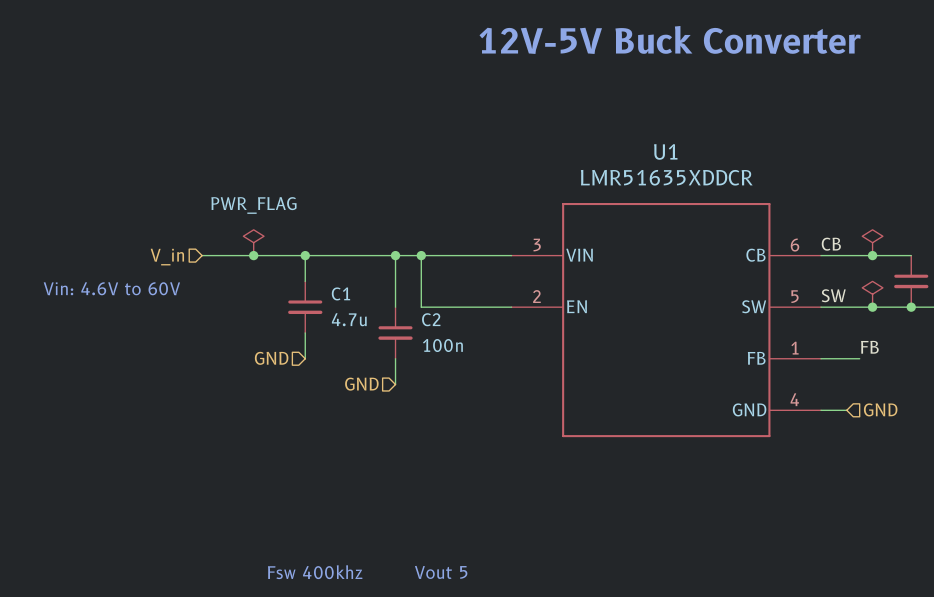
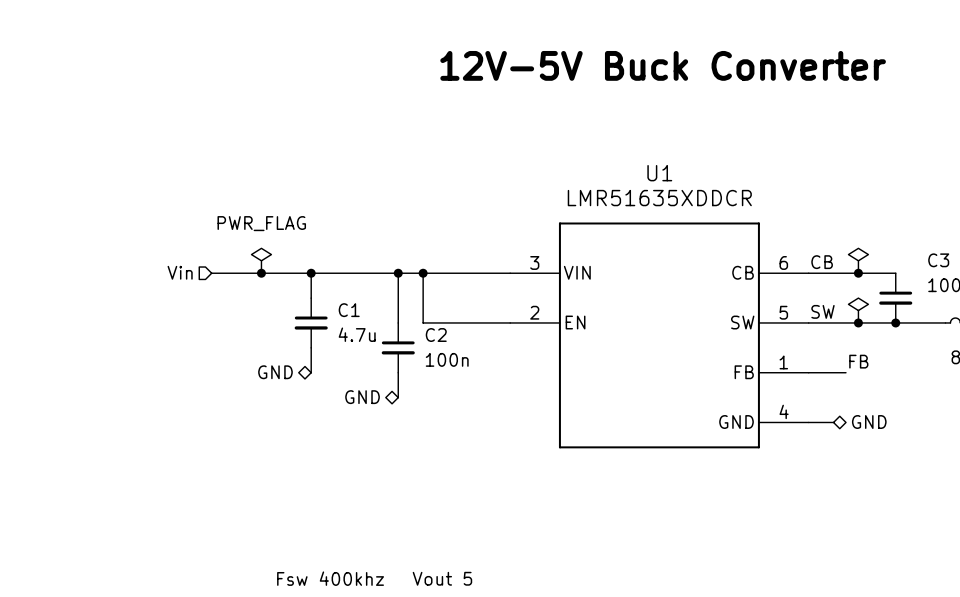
hierarchical label: V_in (167, 257) -> Vin (180, 272)
text: Vin: 4.6V to 60V (111, 288) -> none
hierarchical label shape: input (271, 358) -> bidirectional (275, 372)
hierarchical label shape: input (361, 384) -> bidirectional (362, 397)
hierarchical label shape: input (880, 409) -> bidirectional (869, 422)

